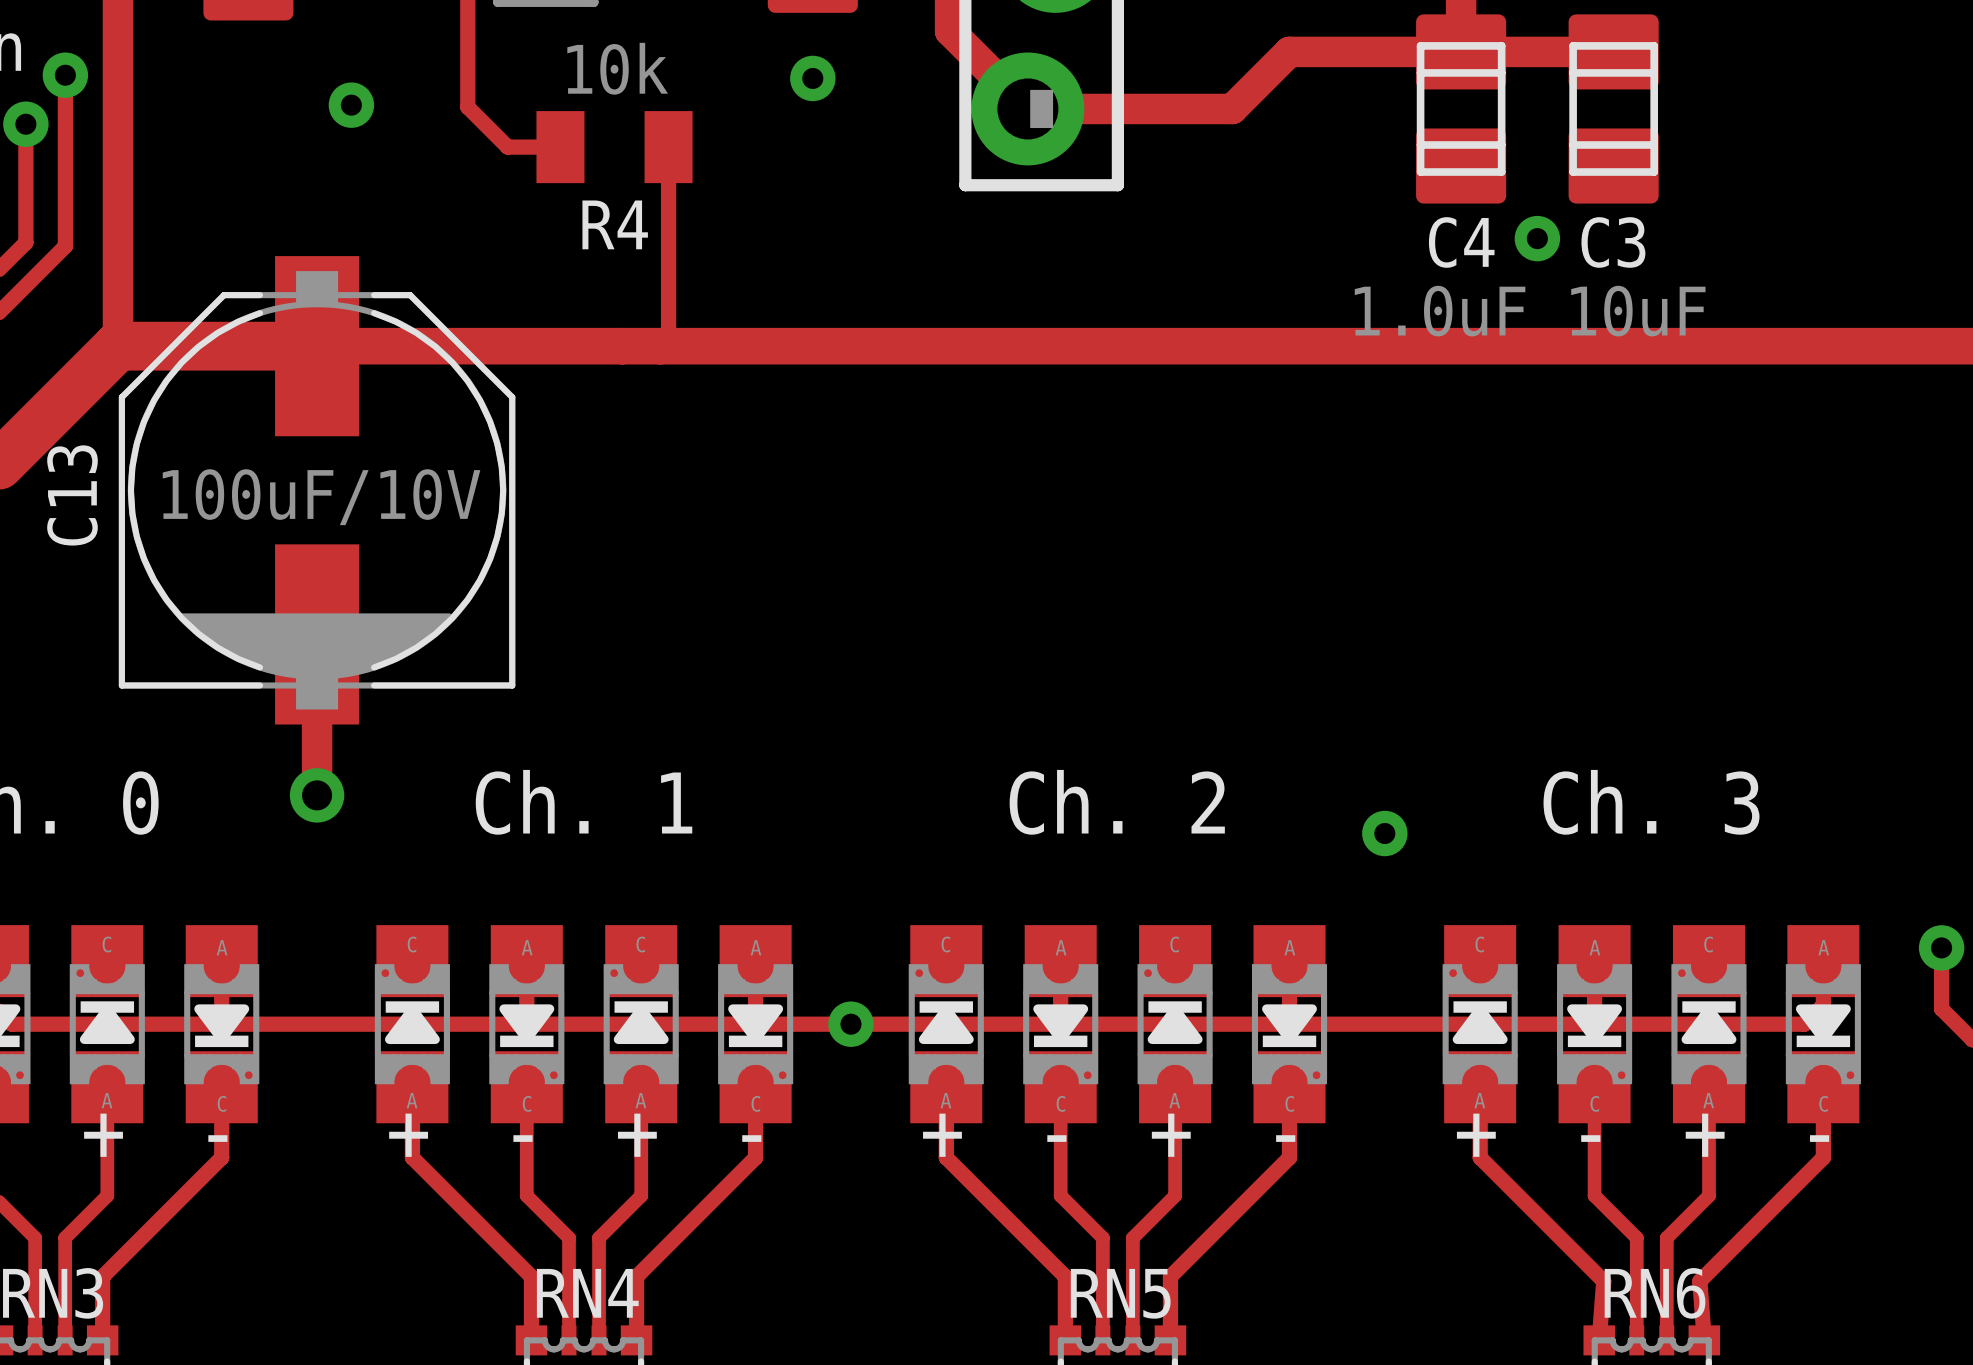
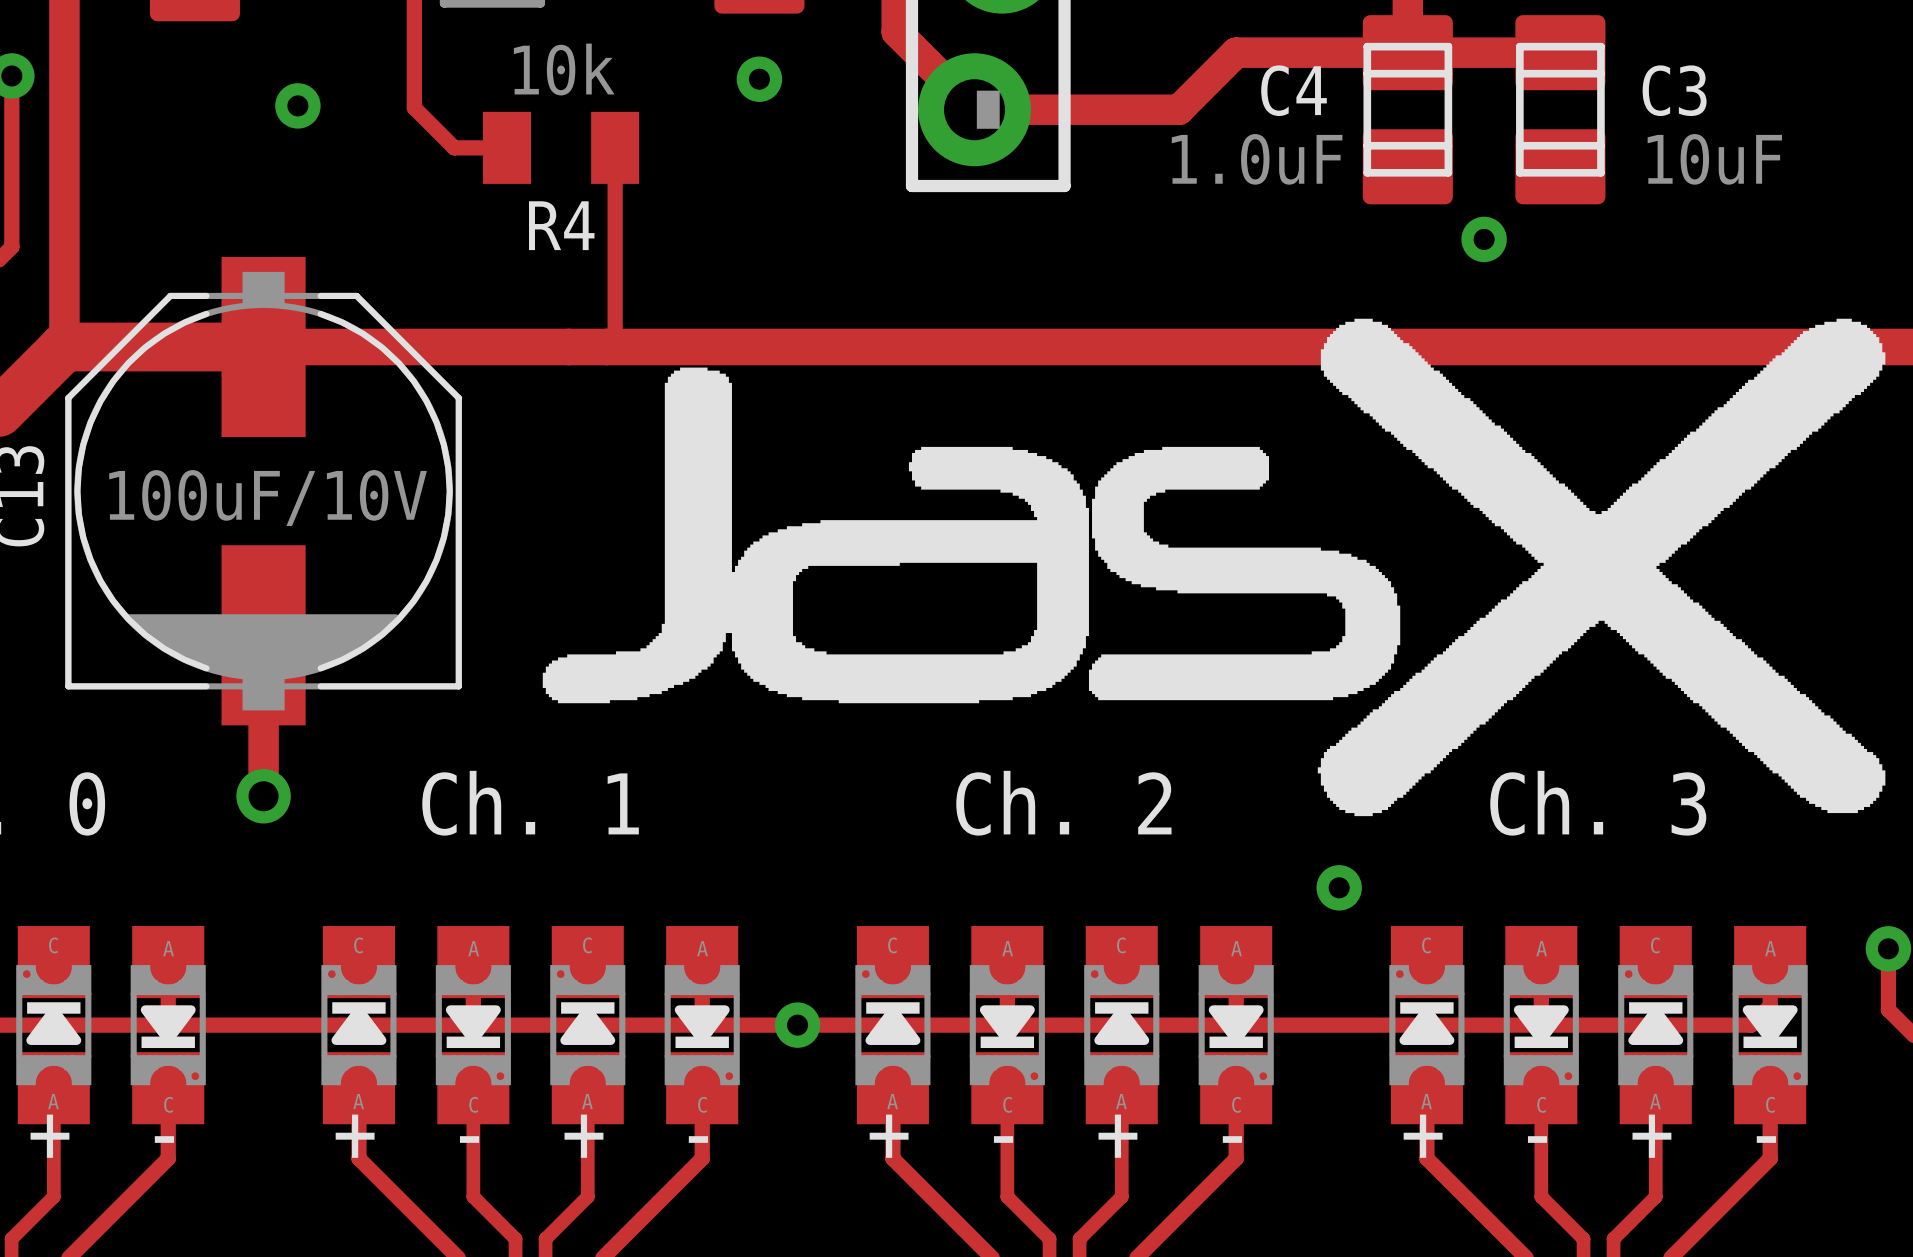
C4 name position: C4 (1461, 242) -> C4 (1294, 90)
C3 name position: C3 (1613, 242) -> C3 (1674, 90)
C4 value position: 1.0uF (1440, 311) -> 1.0uF (1257, 159)
C3 value position: 10uF (1638, 311) -> 10uF (1714, 159)
drawing: none -> [542, 318, 1886, 817]
via position: (1384, 833) -> (1339, 887)

